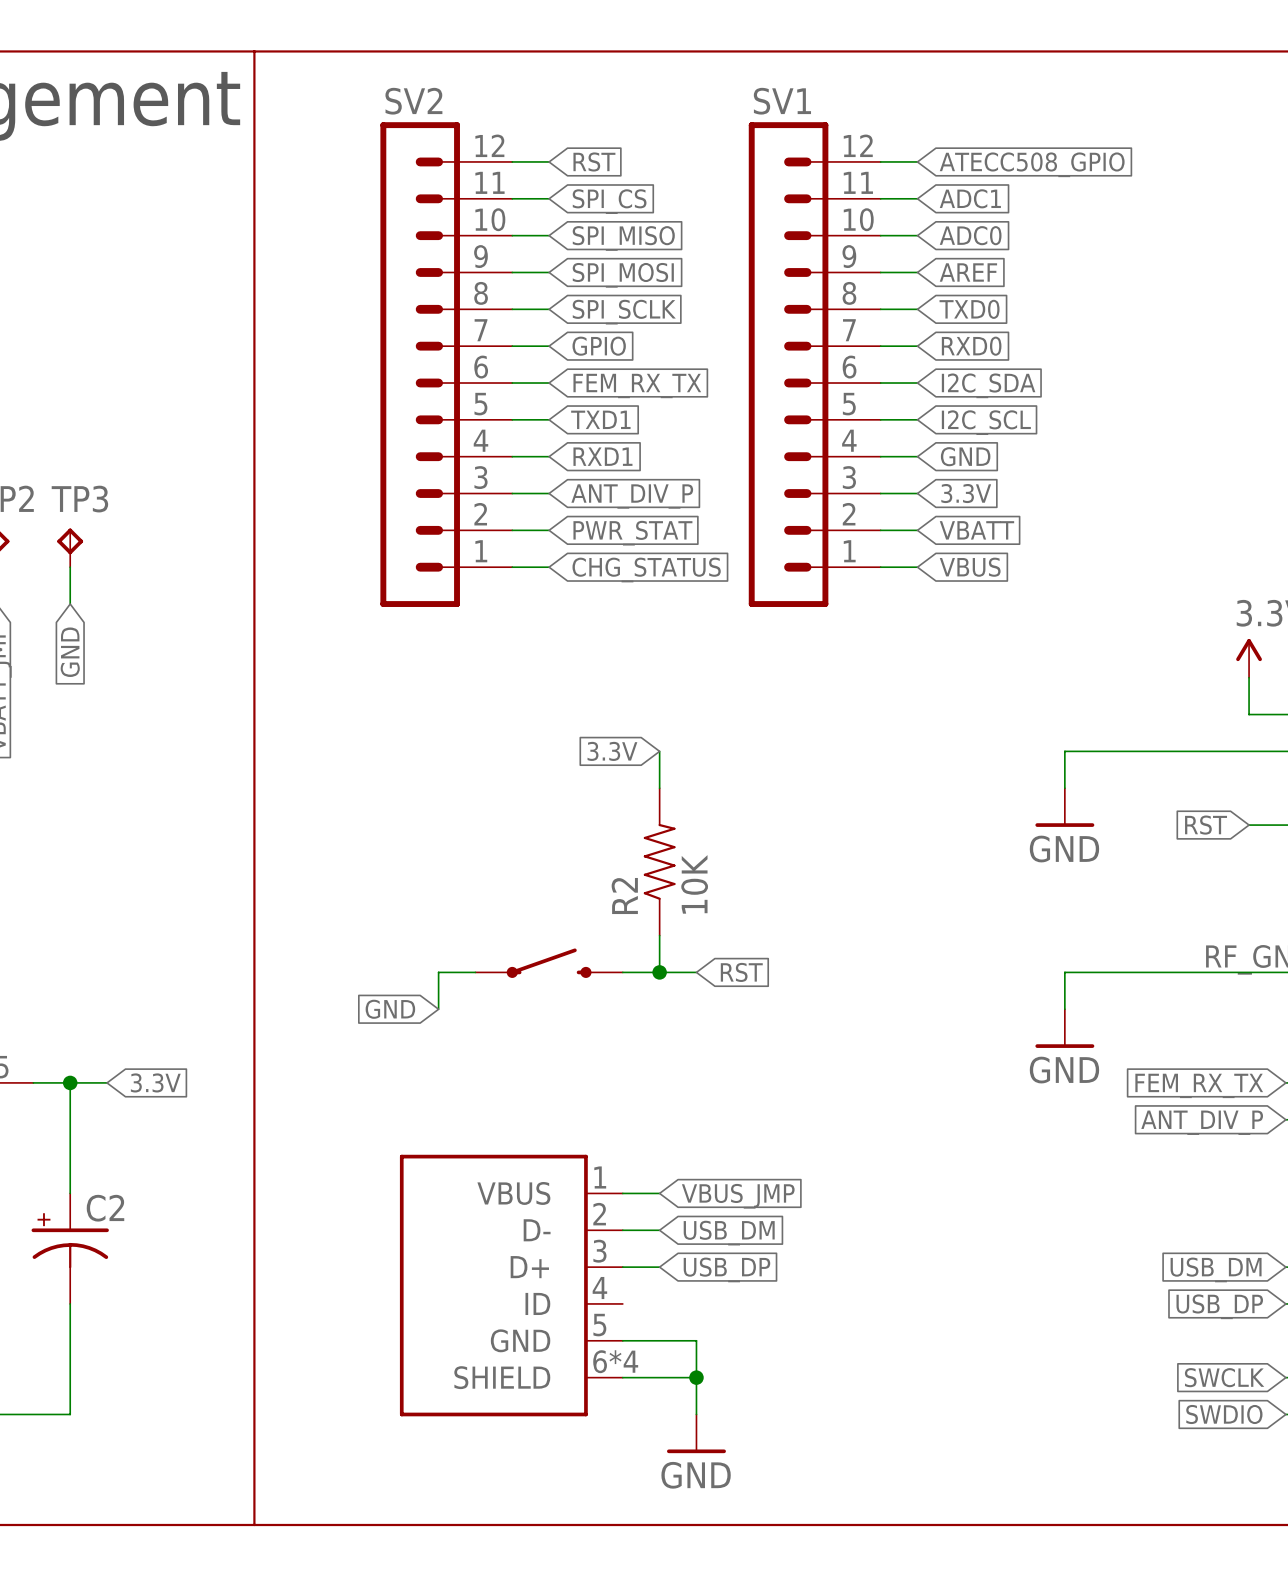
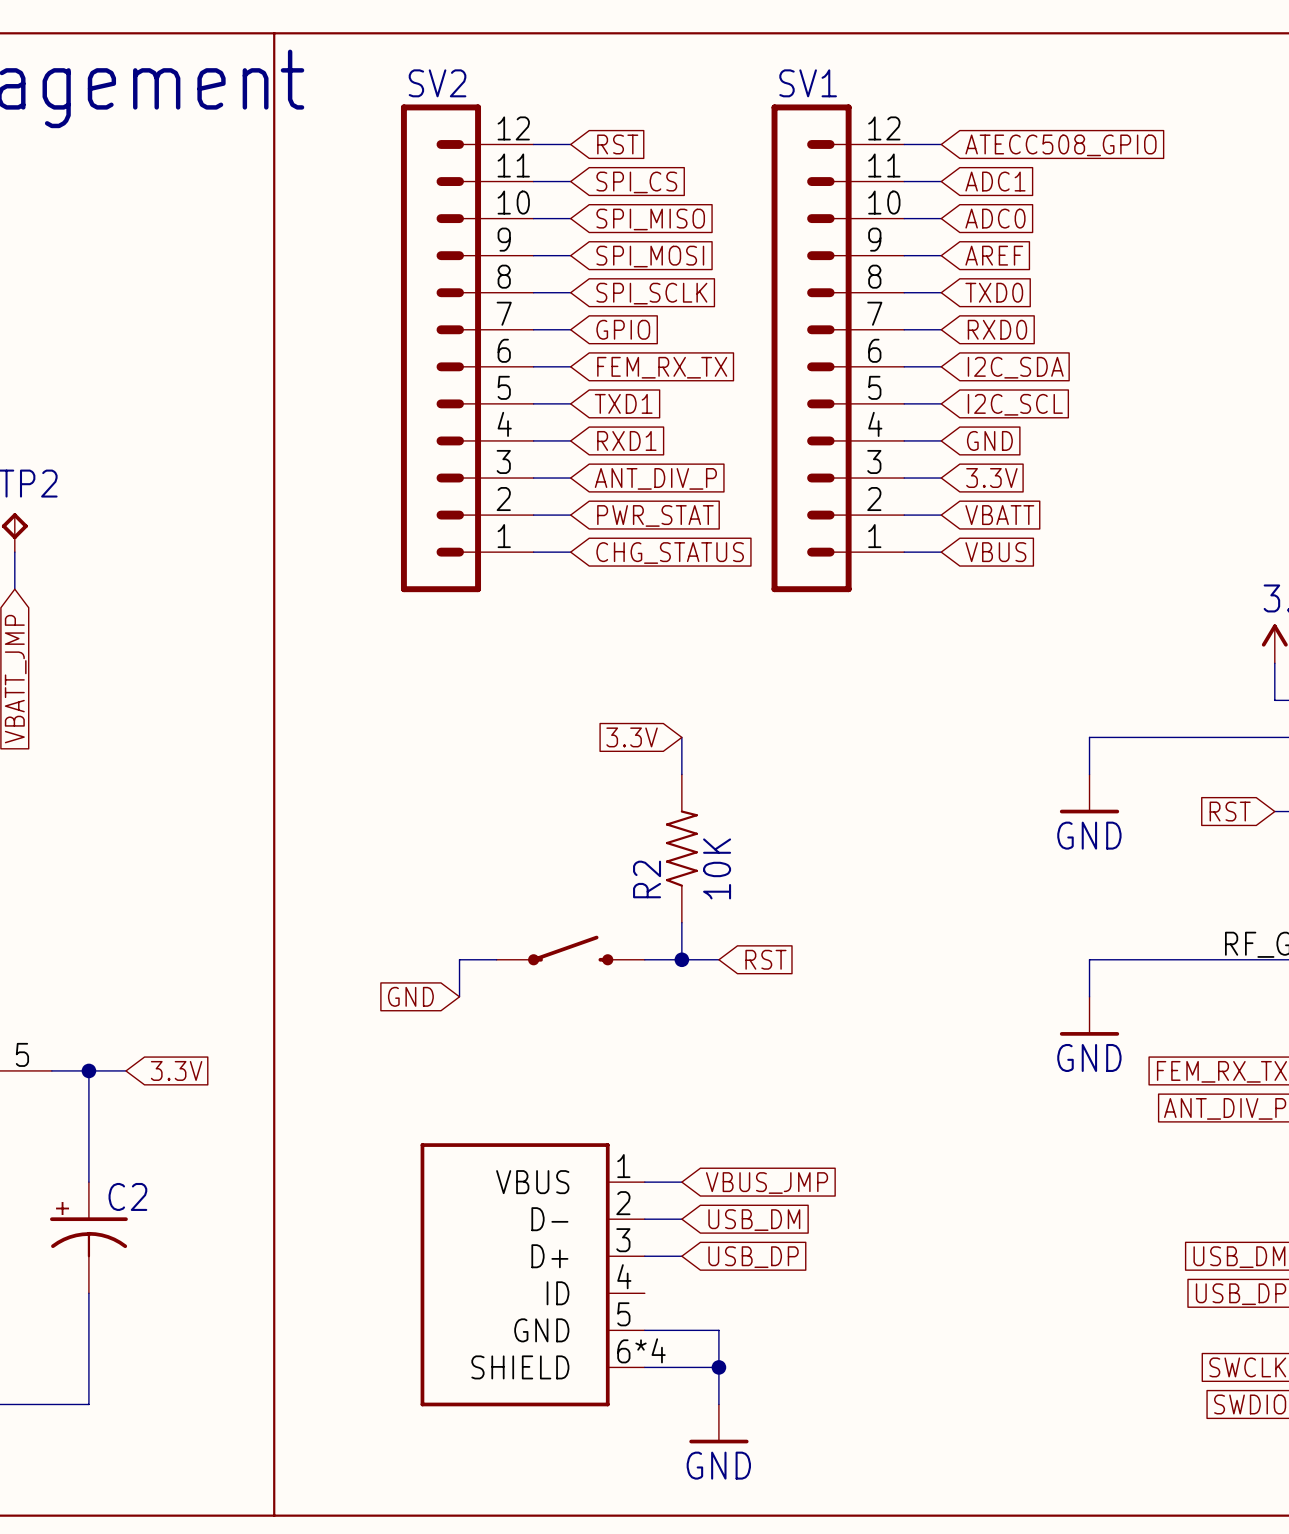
TP3: (70, 547) -> none
wire: (70, 567) (70, 604) -> none
global label: GND (70, 652) -> none

